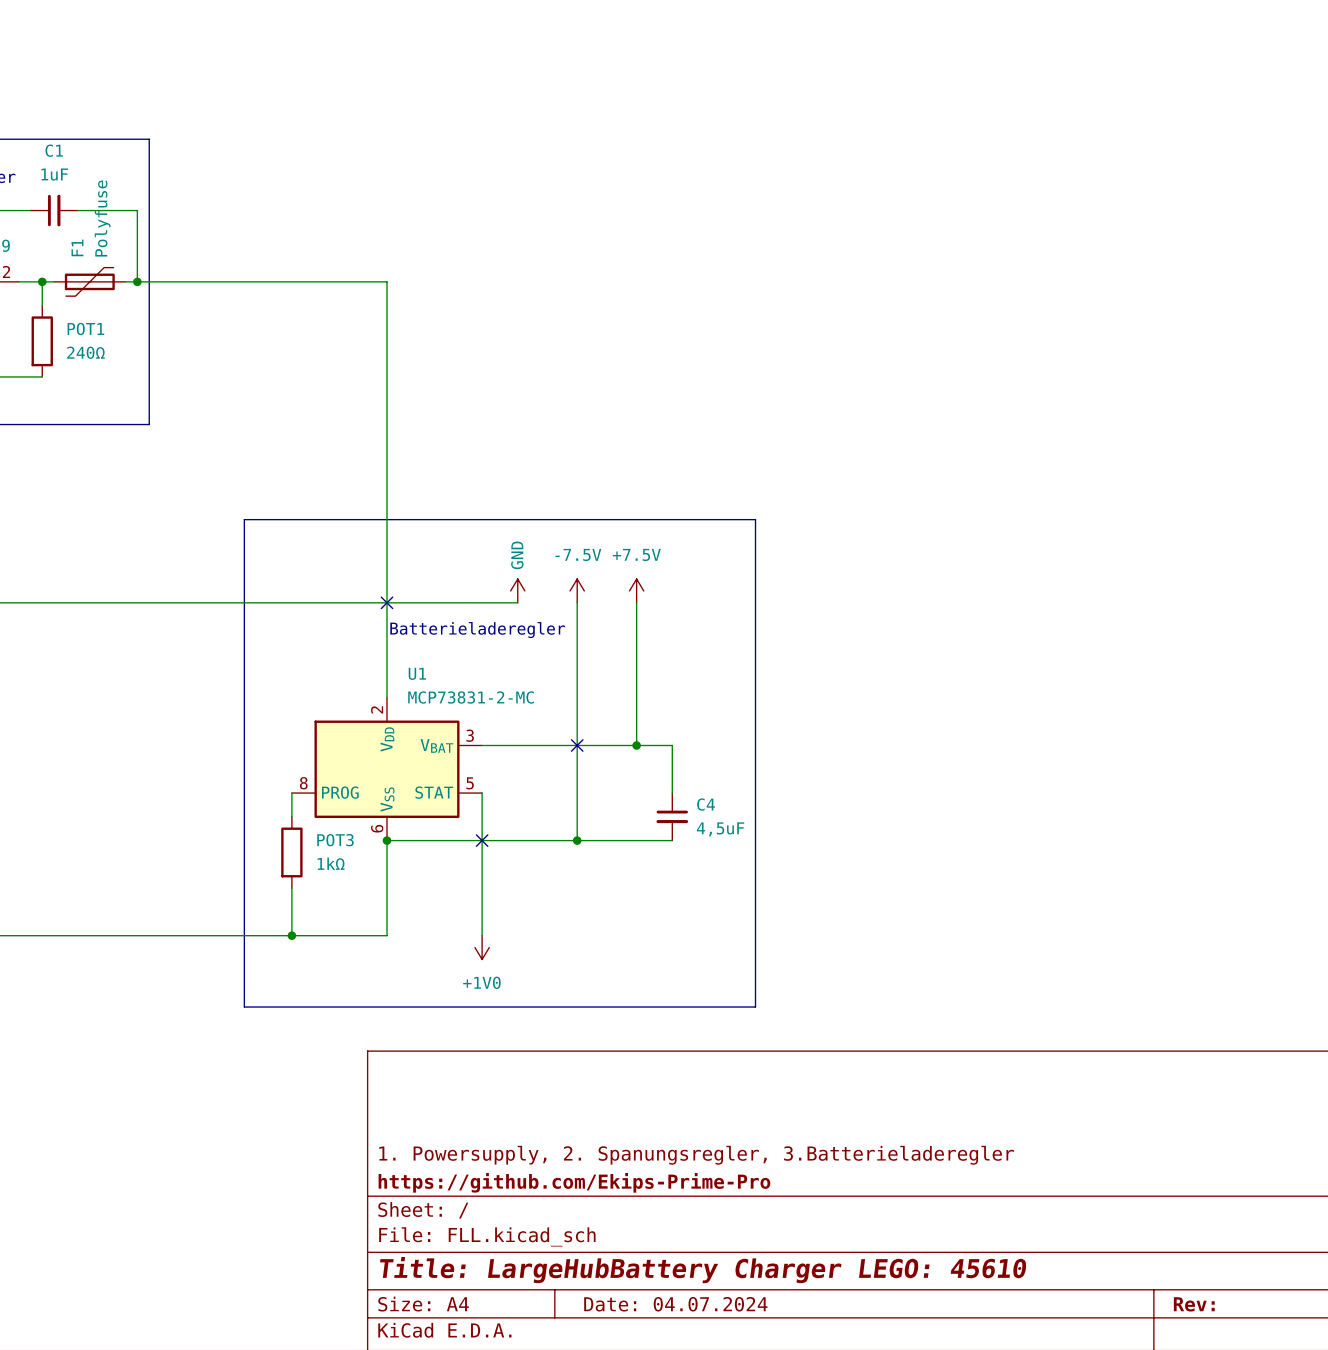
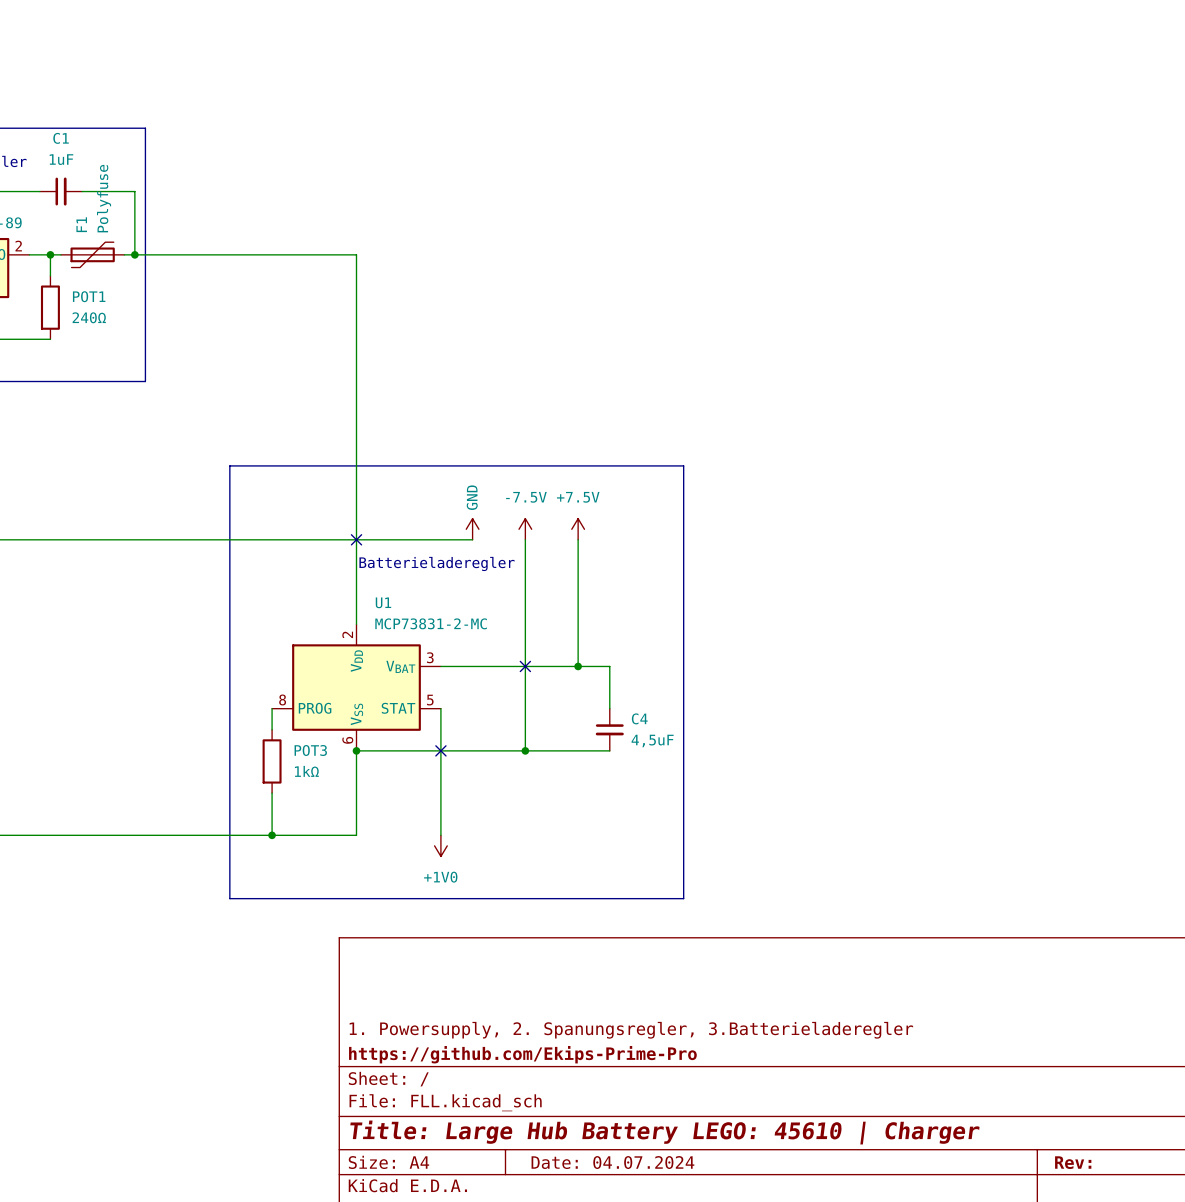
title block: Title: LargeHubBattery Charger LEGO: 45610 (703, 1270) -> Title: Large Hub Battery LEGO: 45610 | Charger (664, 1132)

